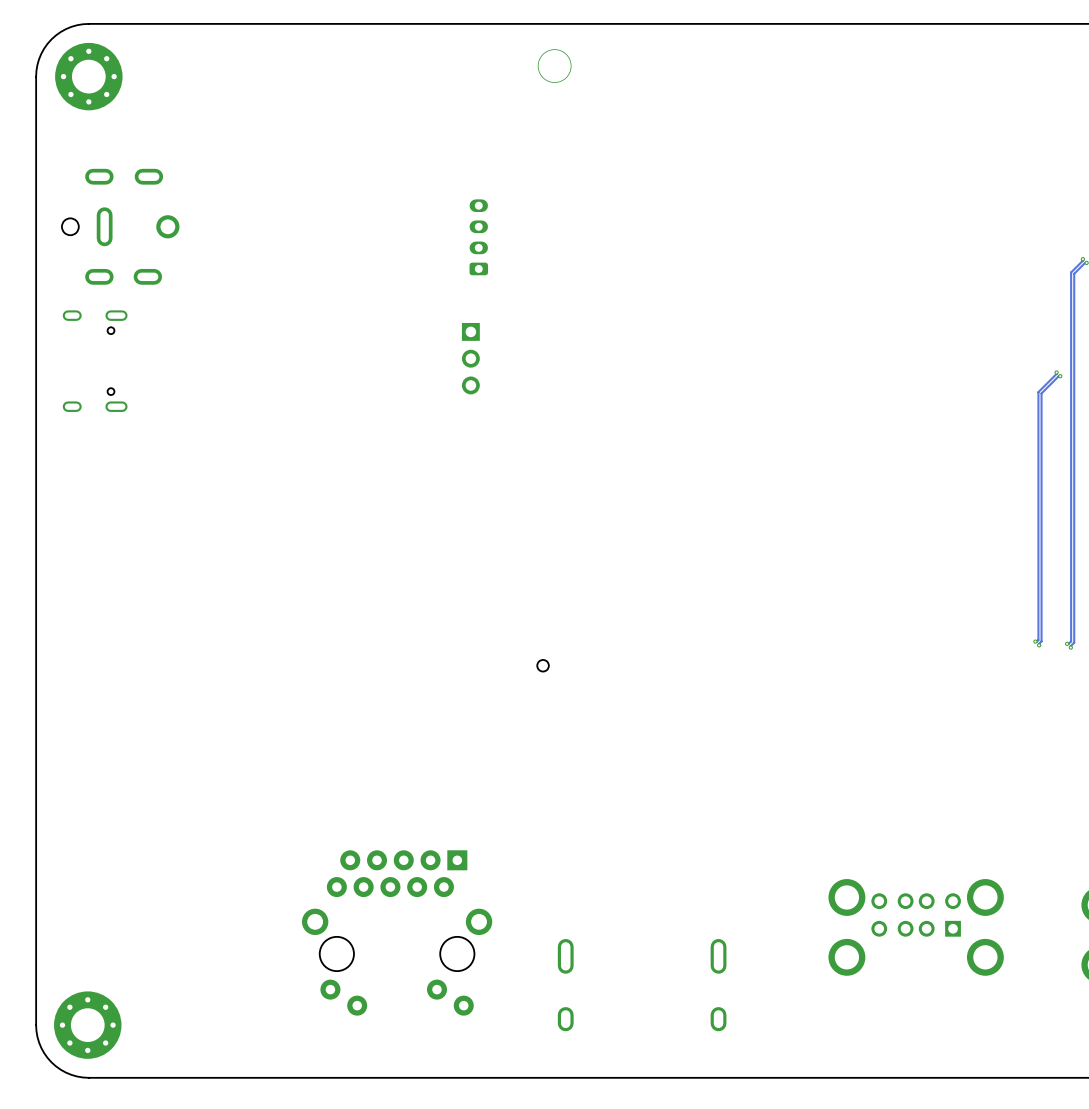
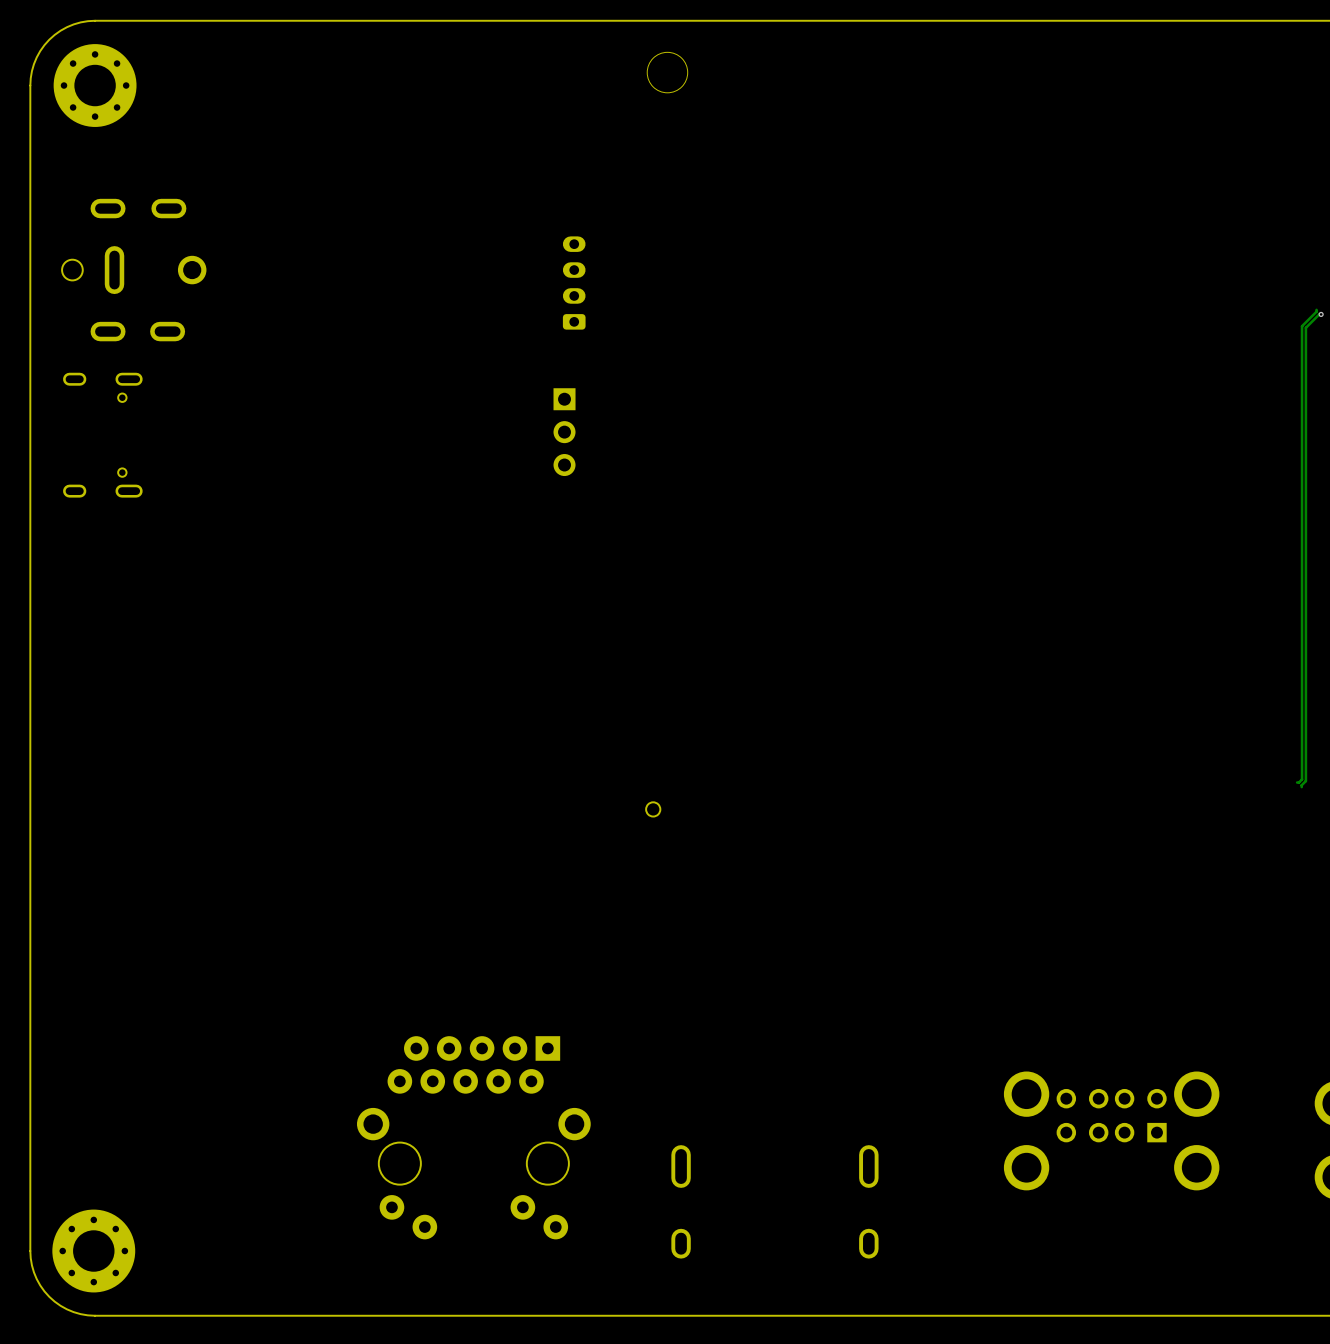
via: (1082, 259) -> none
track: (1056, 372) (1038, 392) (1038, 640) (1035, 641) -> none
via: (1056, 372) -> none
track: (1060, 376) (1041, 393) (1041, 641) (1039, 645) -> none
via: (1060, 376) -> none
via: (1035, 641) -> none
via: (1067, 643) -> none
via: (1039, 645) -> none
via: (1070, 647) -> none

